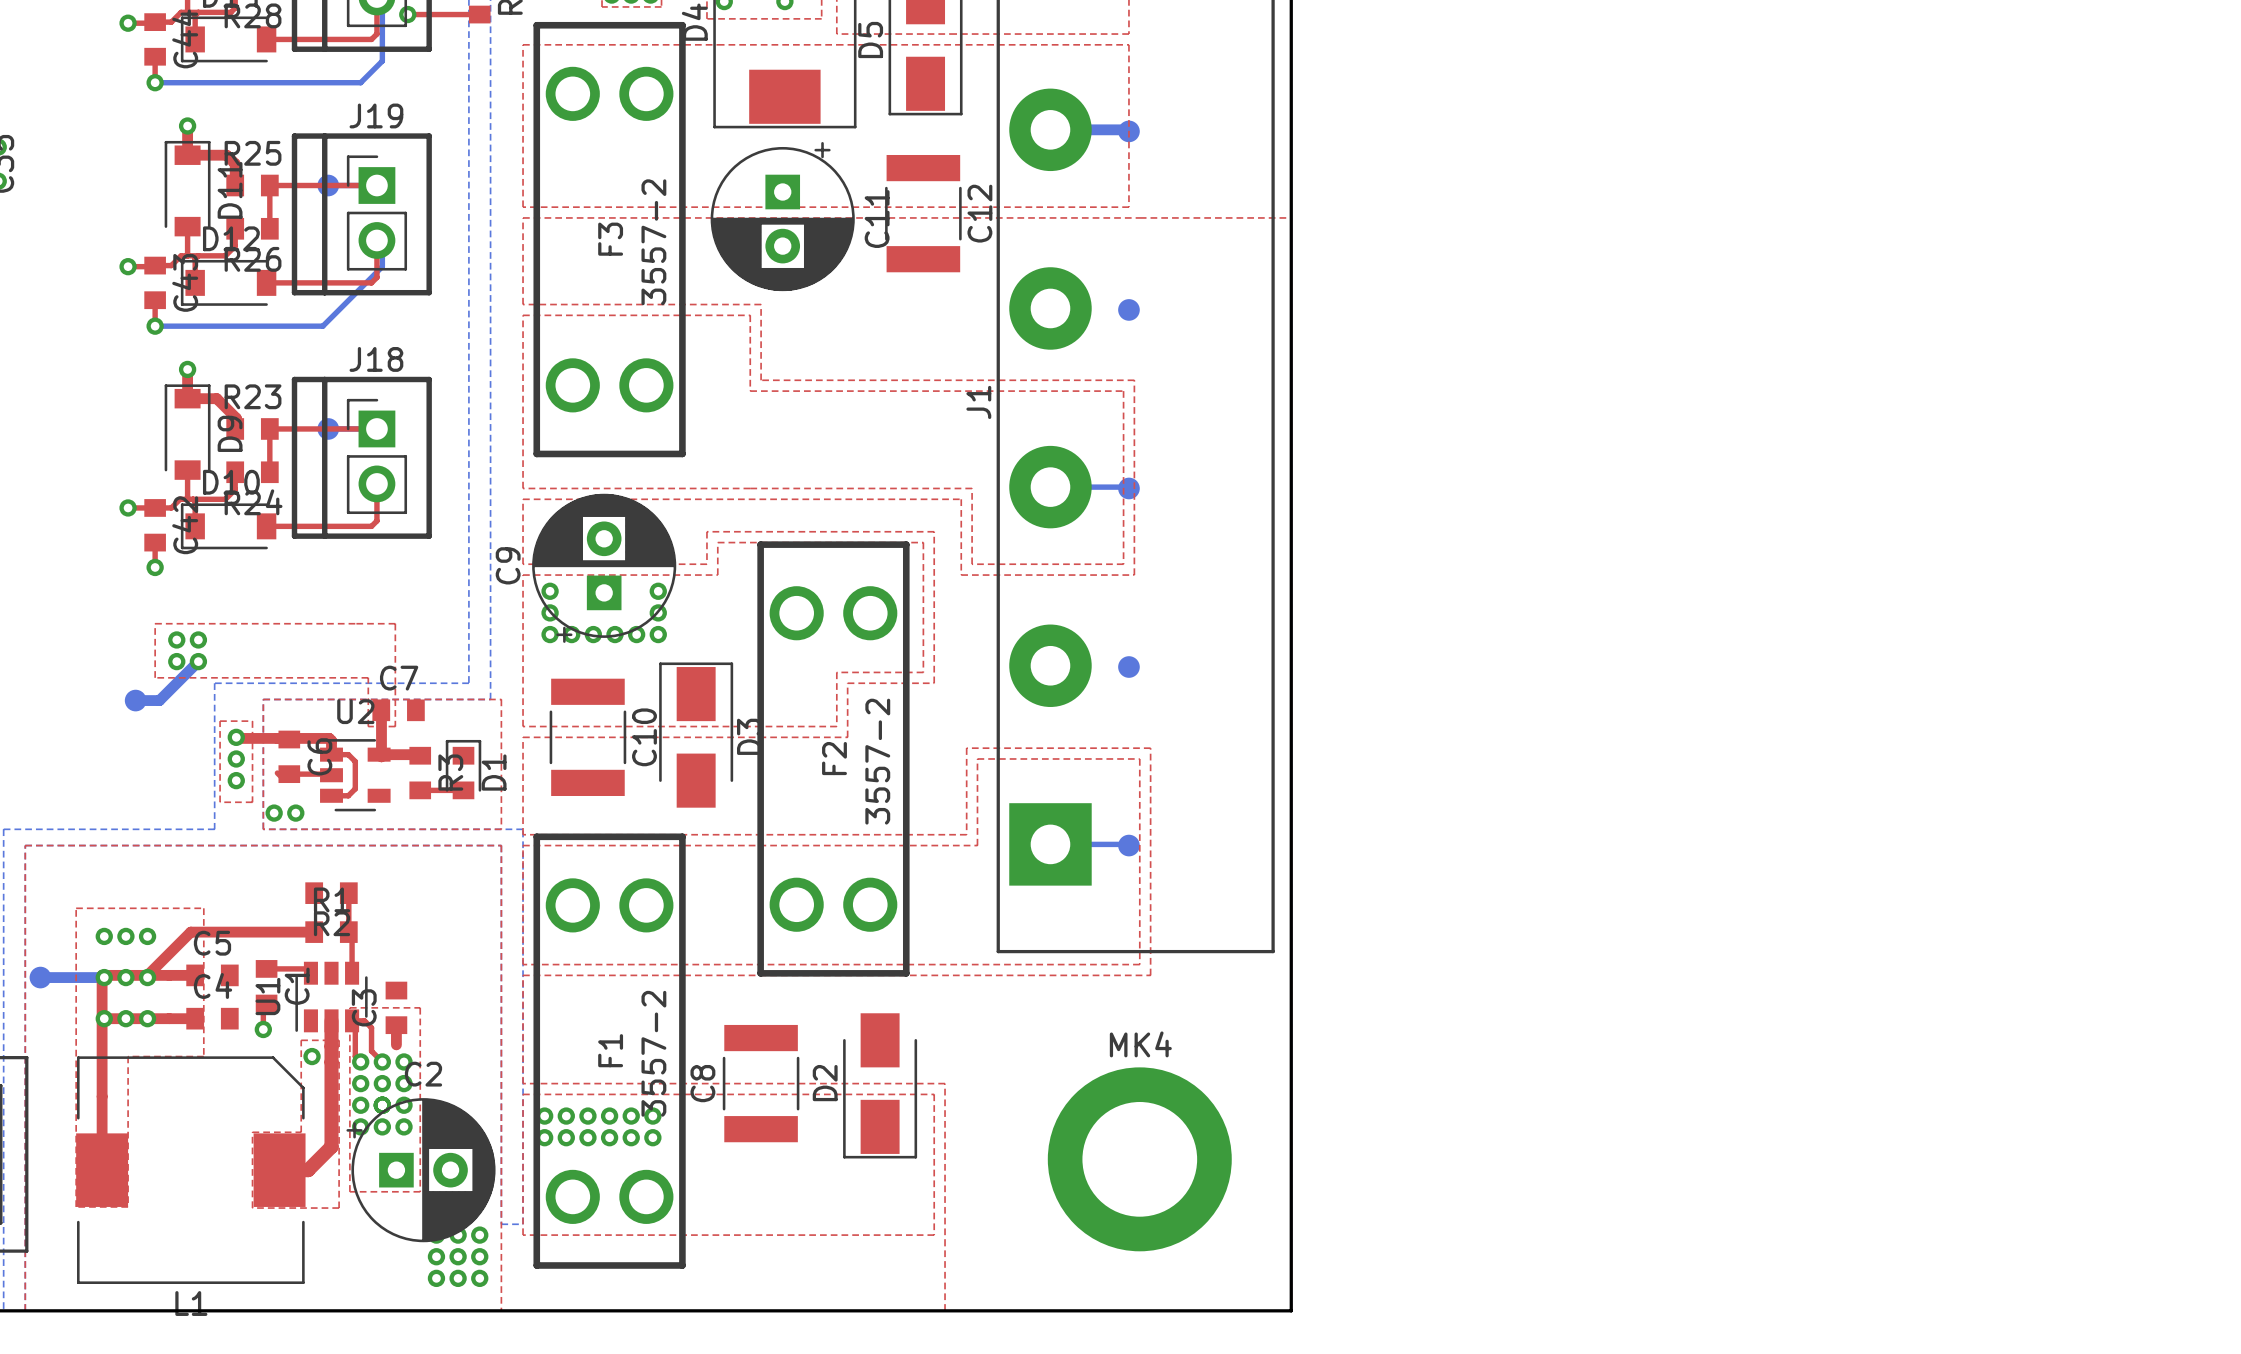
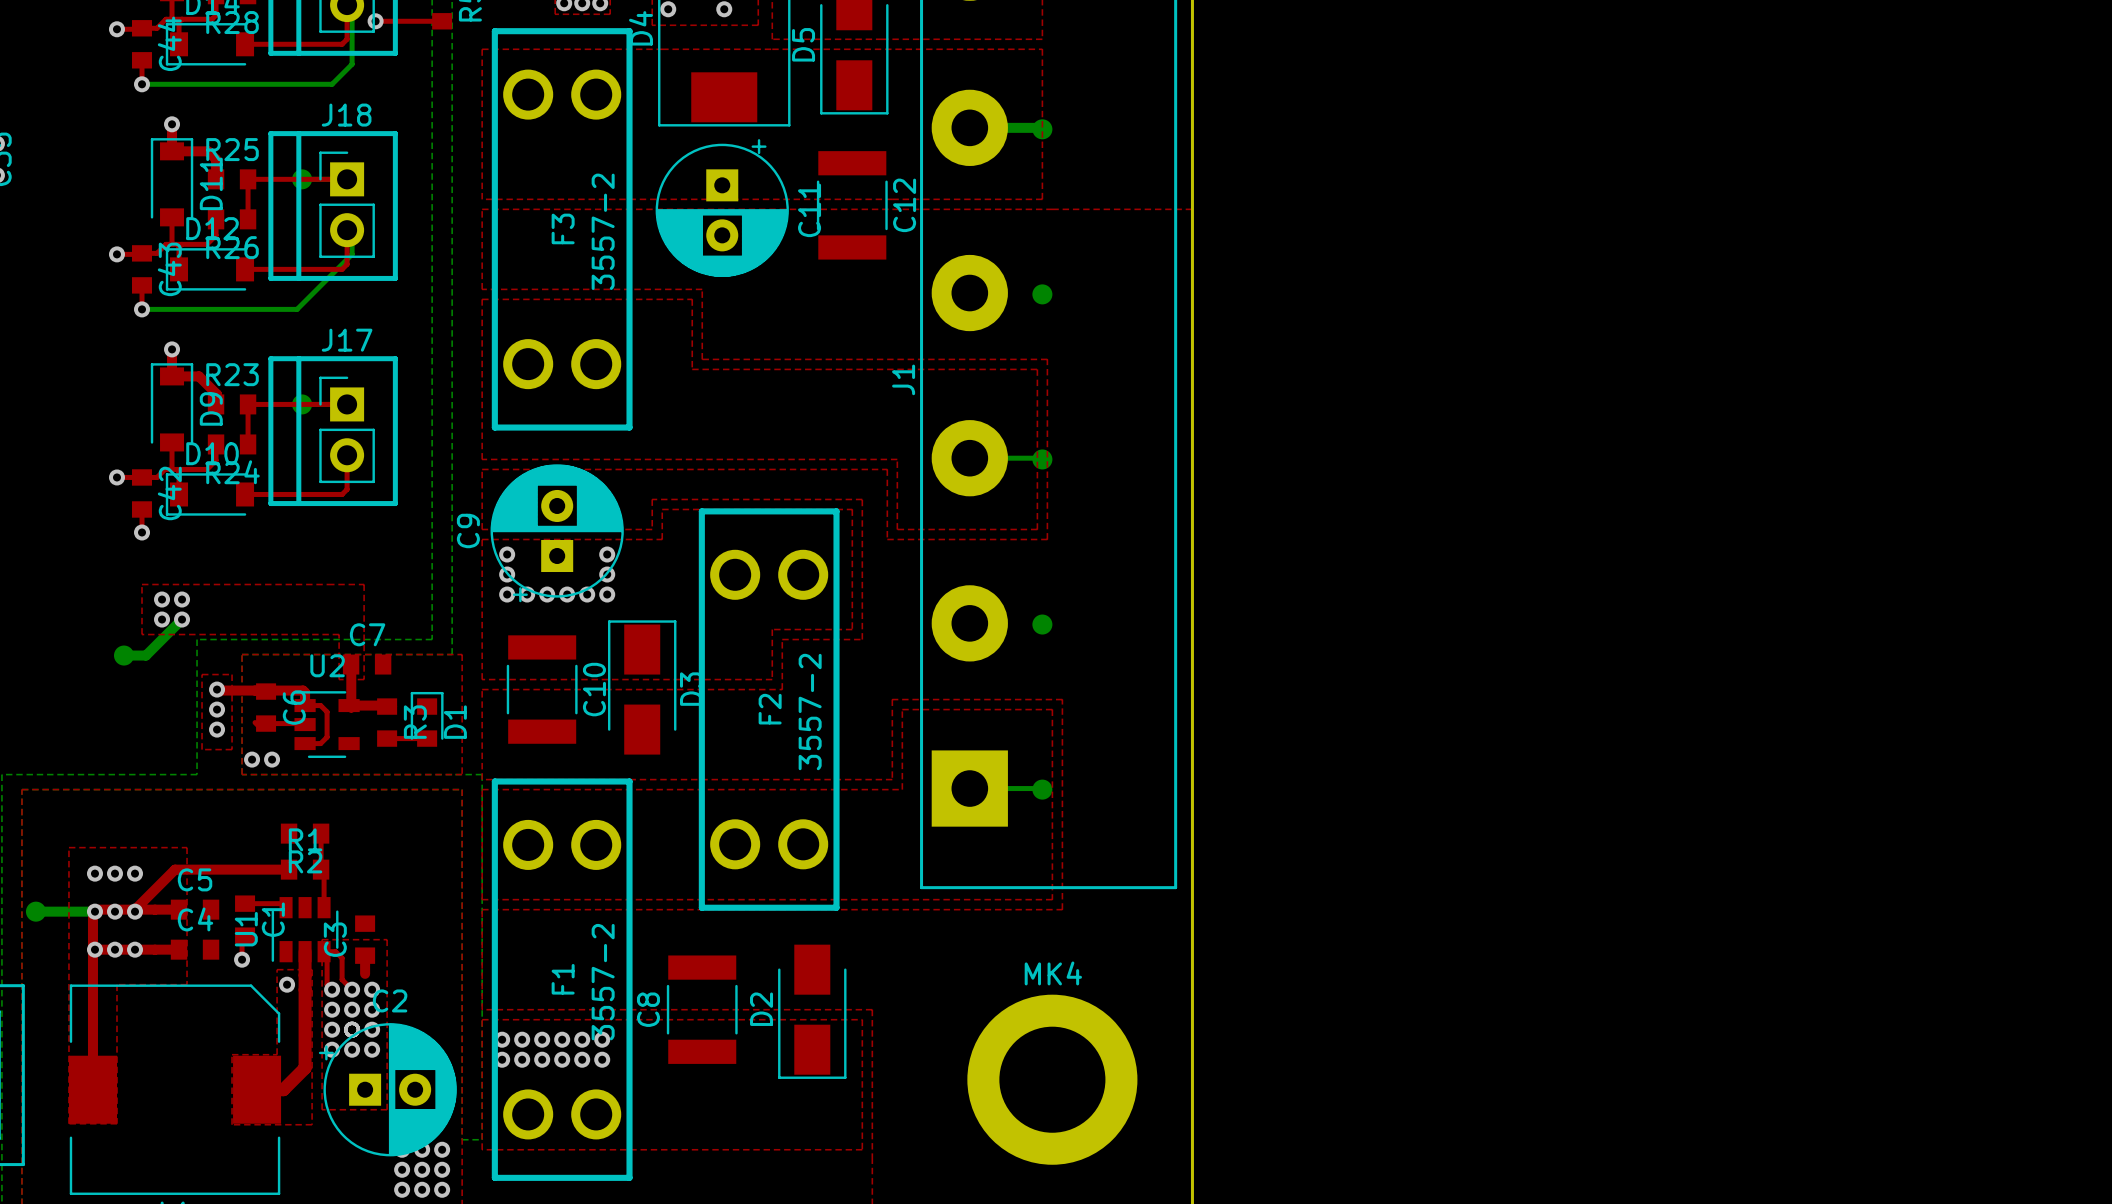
J19 name: J19 (376, 115) -> J18 (346, 115)
J18 name: J18 (376, 359) -> J17 (347, 340)

